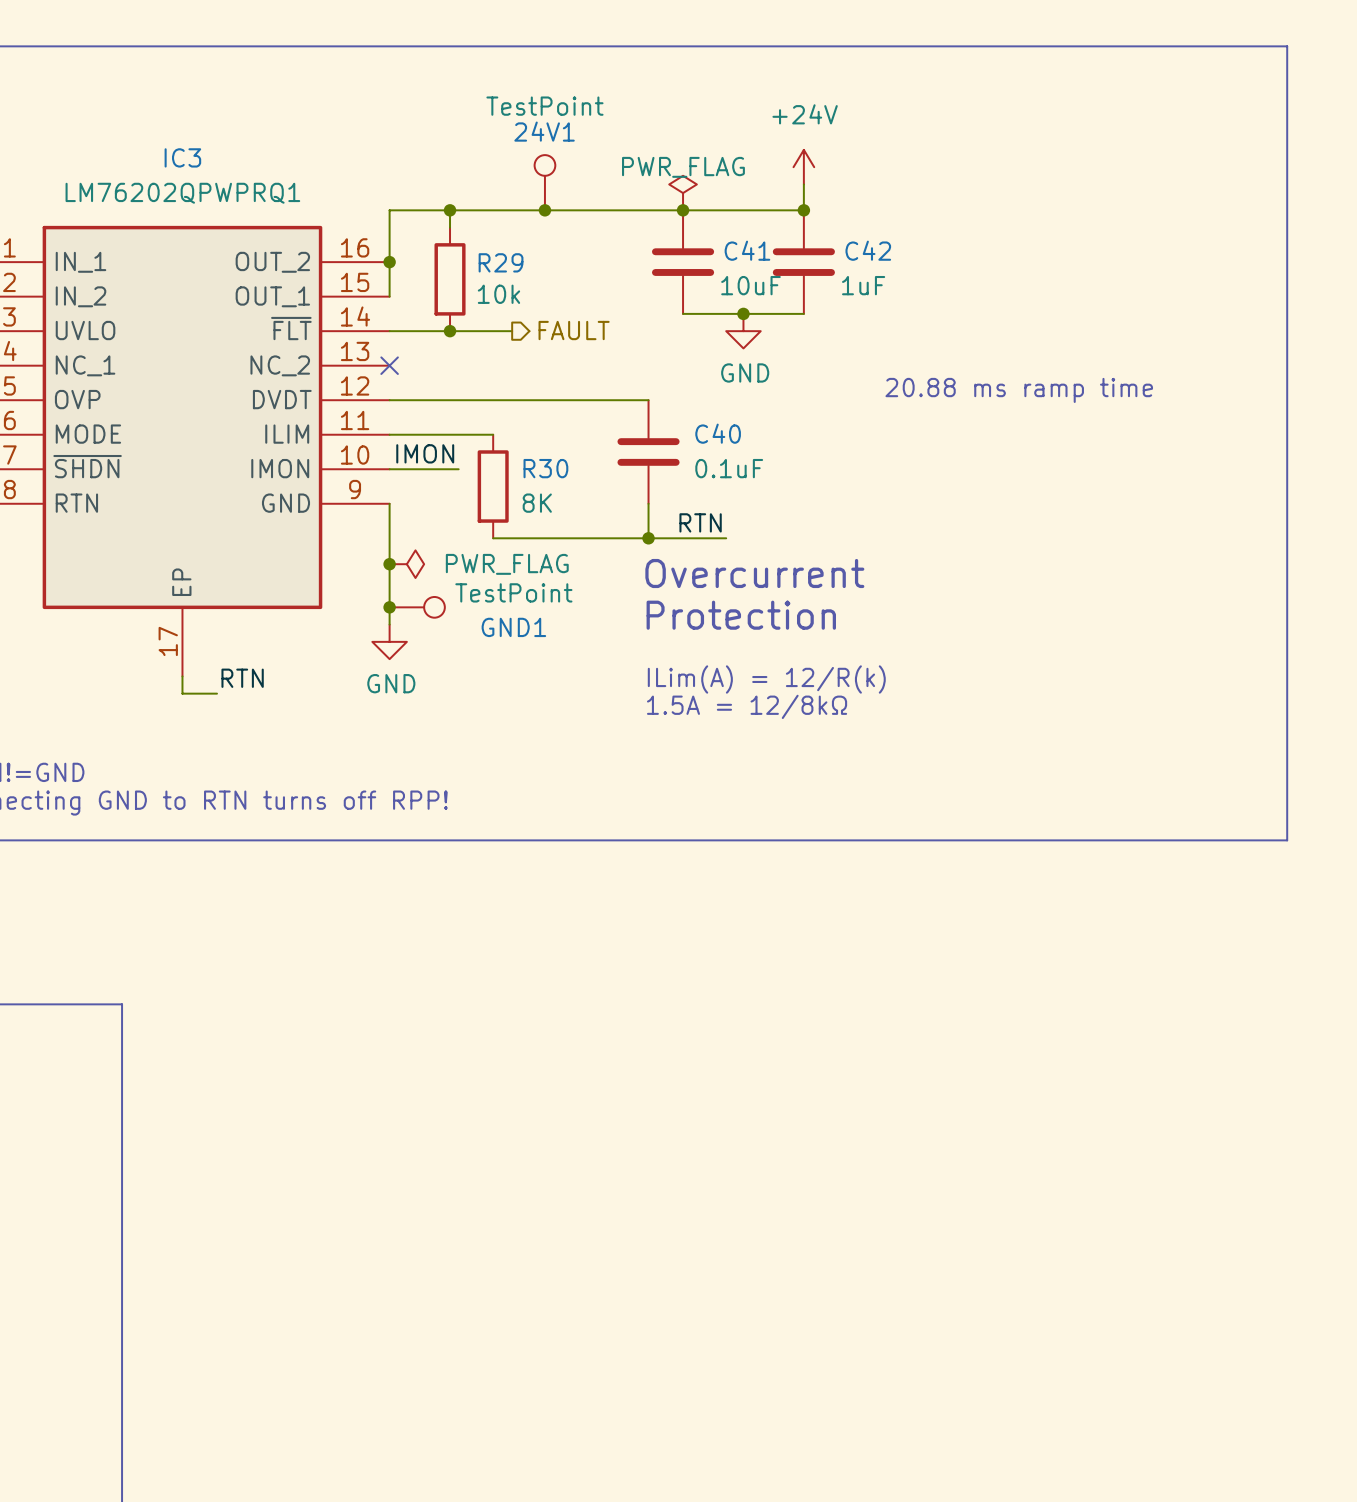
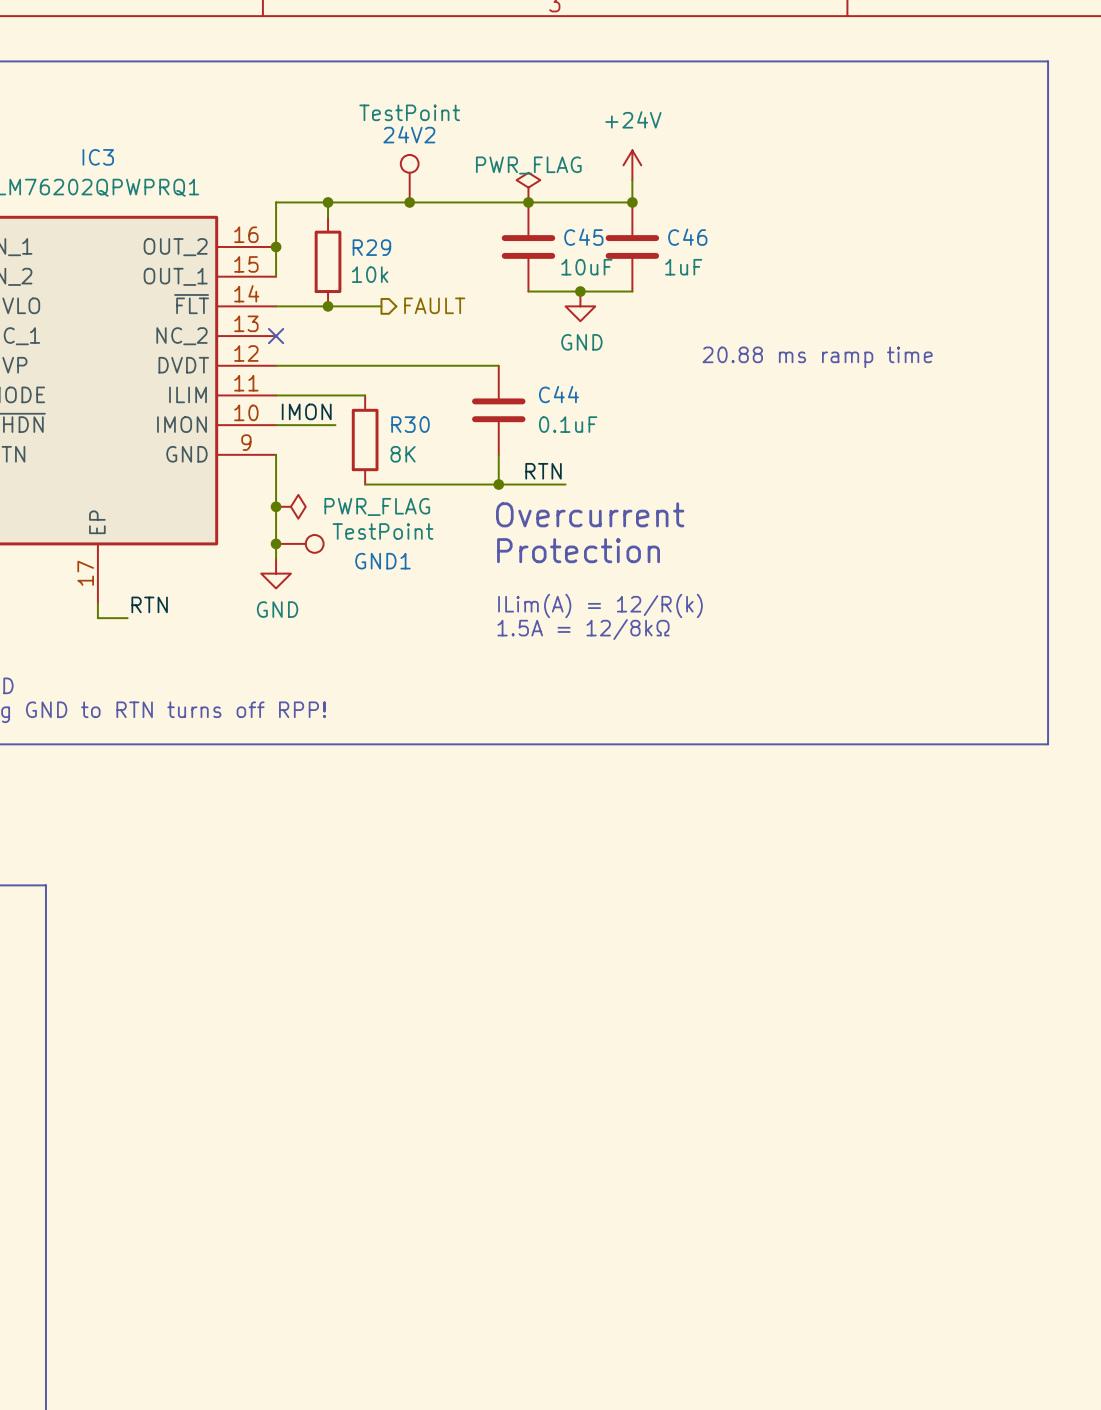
24V1 name: 24V1 (544, 131) -> 24V2 (409, 134)
C41 name: C41 (747, 250) -> C45 (583, 237)
C42 name: C42 (868, 250) -> C46 (687, 237)
C40 name: C40 (718, 433) -> C44 (558, 394)

